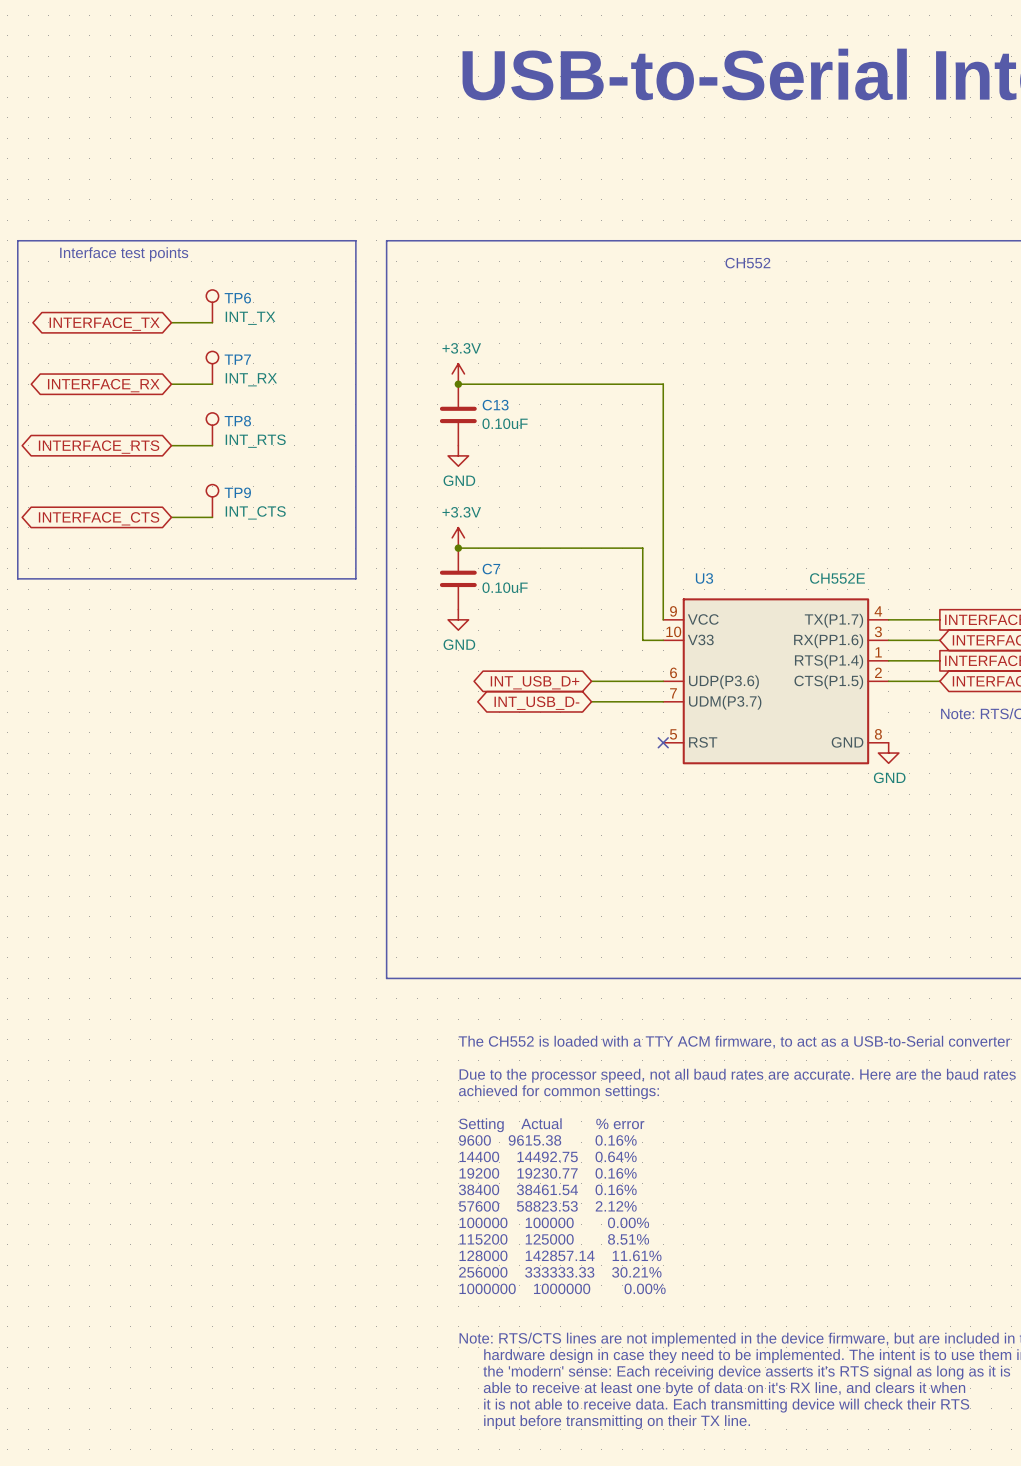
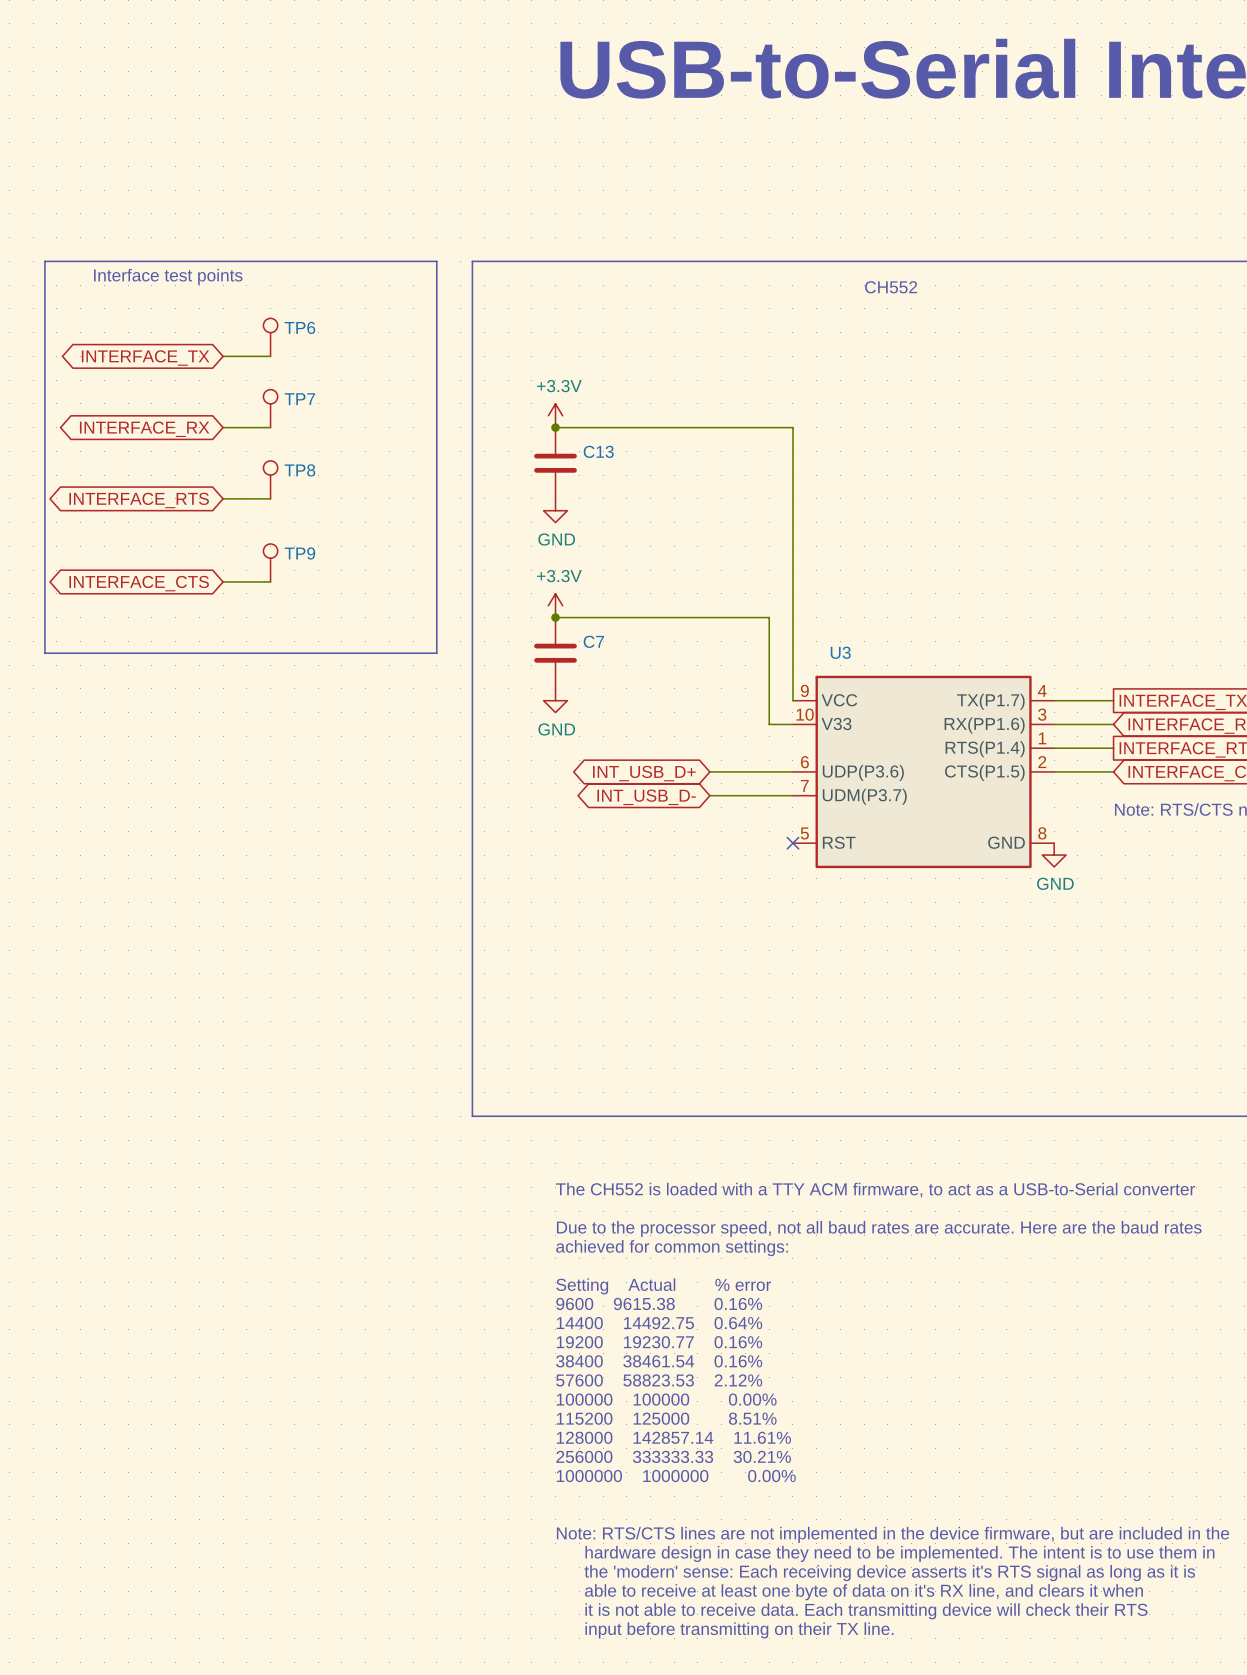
TP6 value: INT_TX (250, 318) -> none
TP7 value: INT_RX (251, 379) -> none
C13 value: 0.10uF (505, 423) -> none
TP8 value: INT_RTS (255, 441) -> none
TP9 value: INT_CTS (255, 512) -> none
U3 value: CH552E (837, 578) -> none
C7 value: 0.10uF (505, 587) -> none

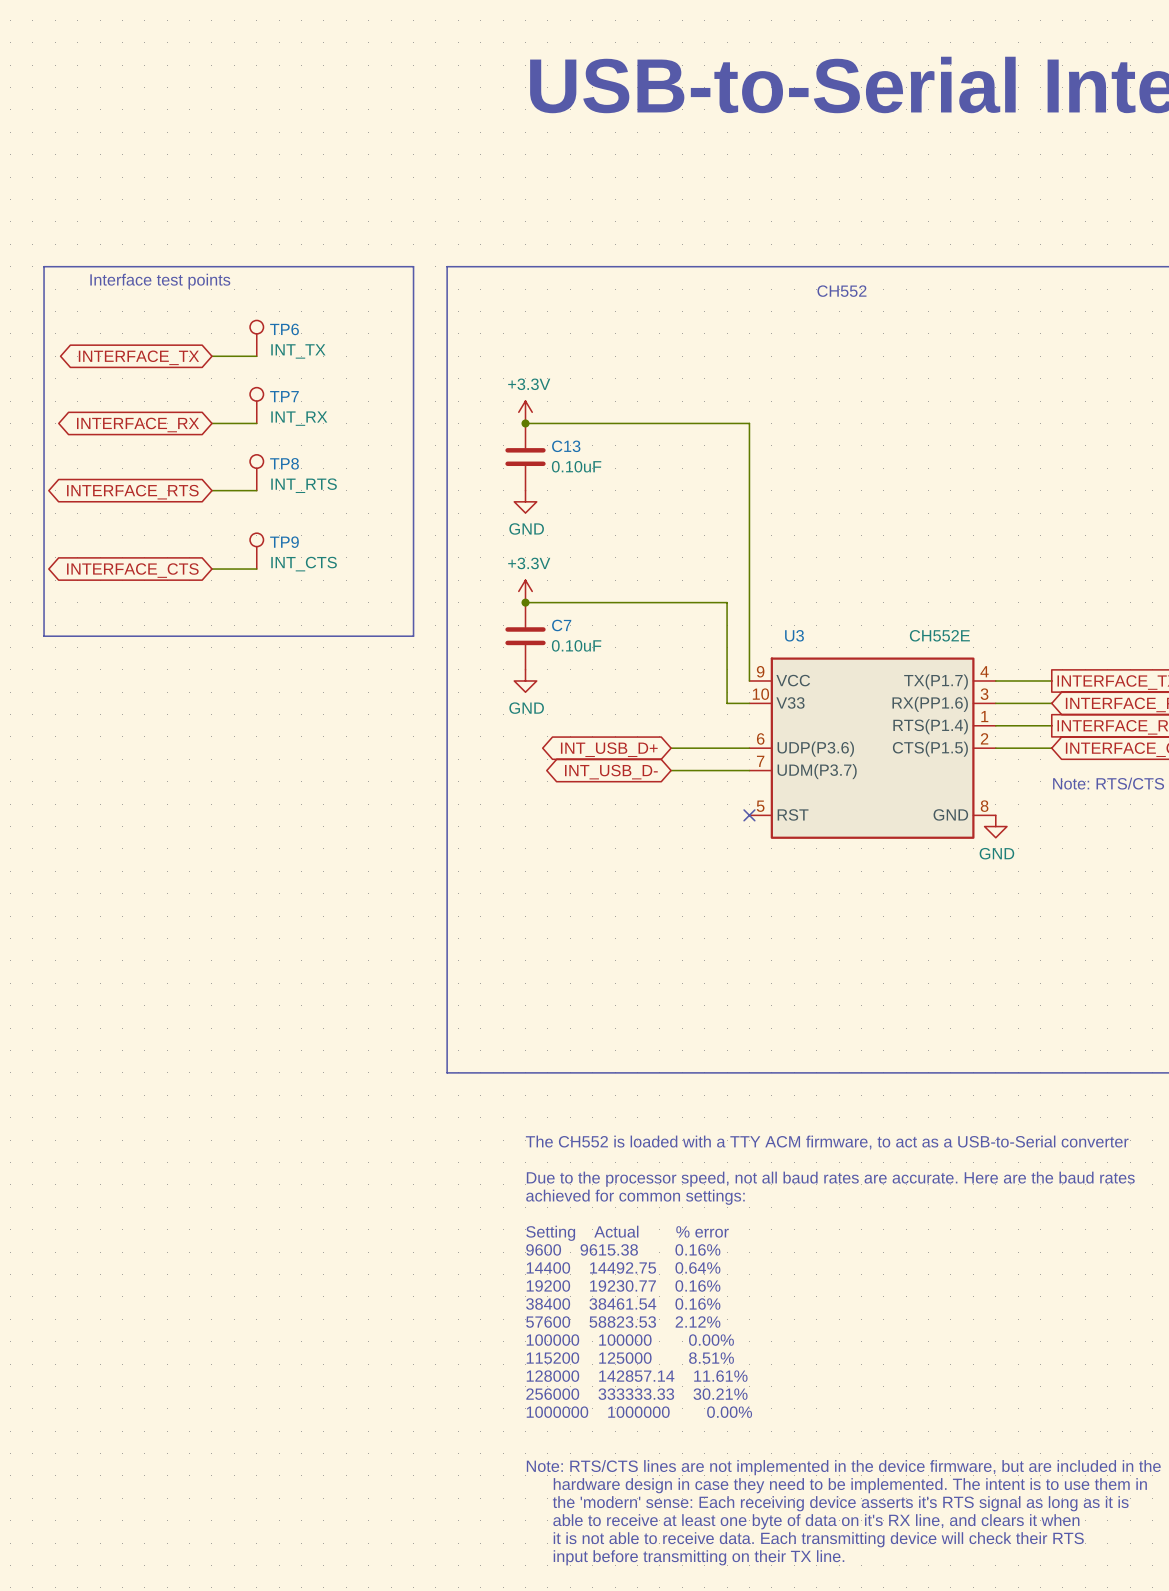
TP6 value: none -> INT_TX (298, 351)
TP7 value: none -> INT_RX (299, 418)
C13 value: none -> 0.10uF (576, 466)
TP8 value: none -> INT_RTS (304, 485)
TP9 value: none -> INT_CTS (304, 564)
U3 value: none -> CH552E (939, 635)
C7 value: none -> 0.10uF (576, 645)

